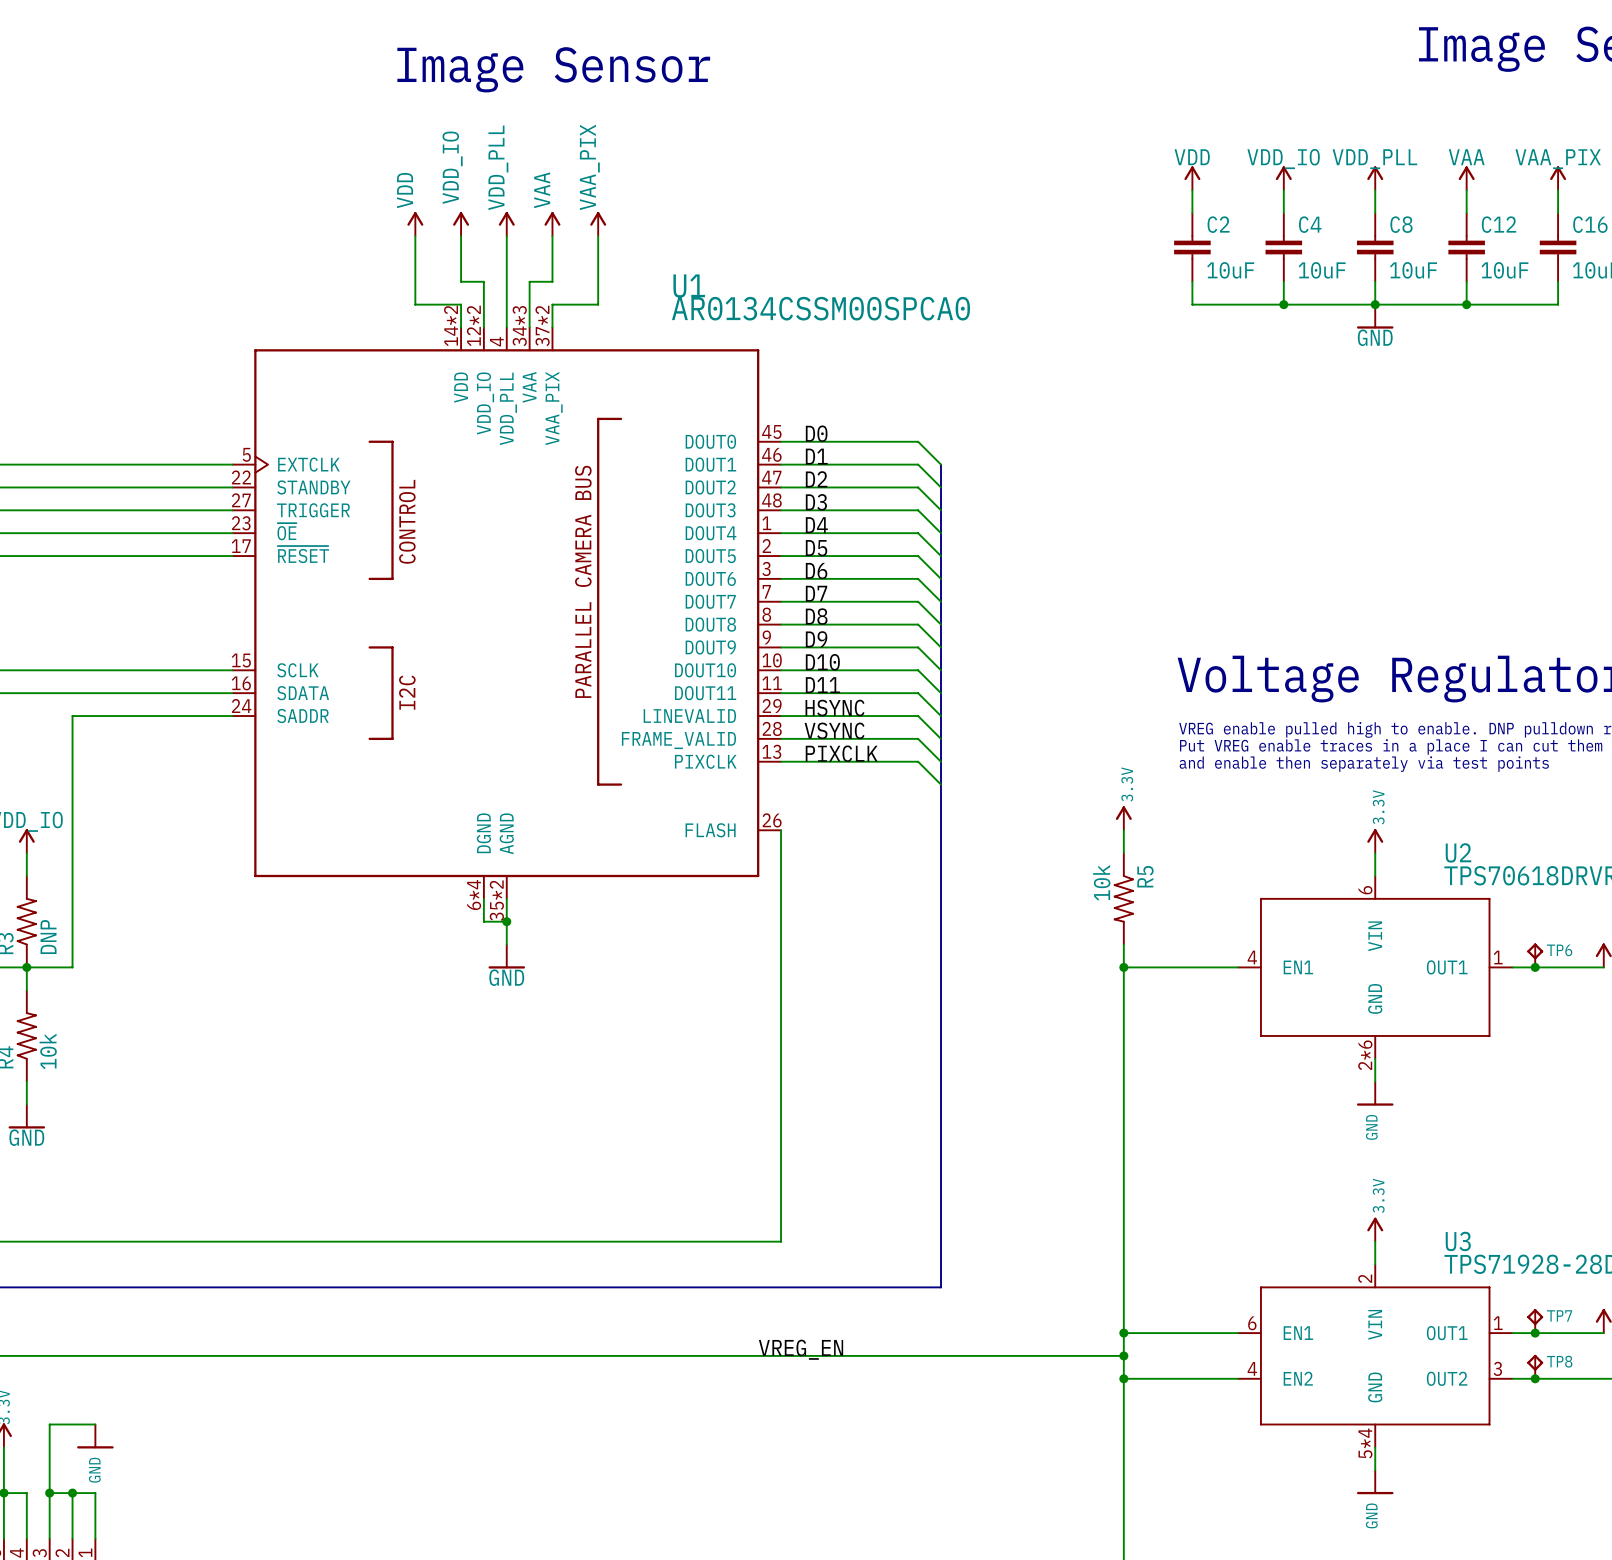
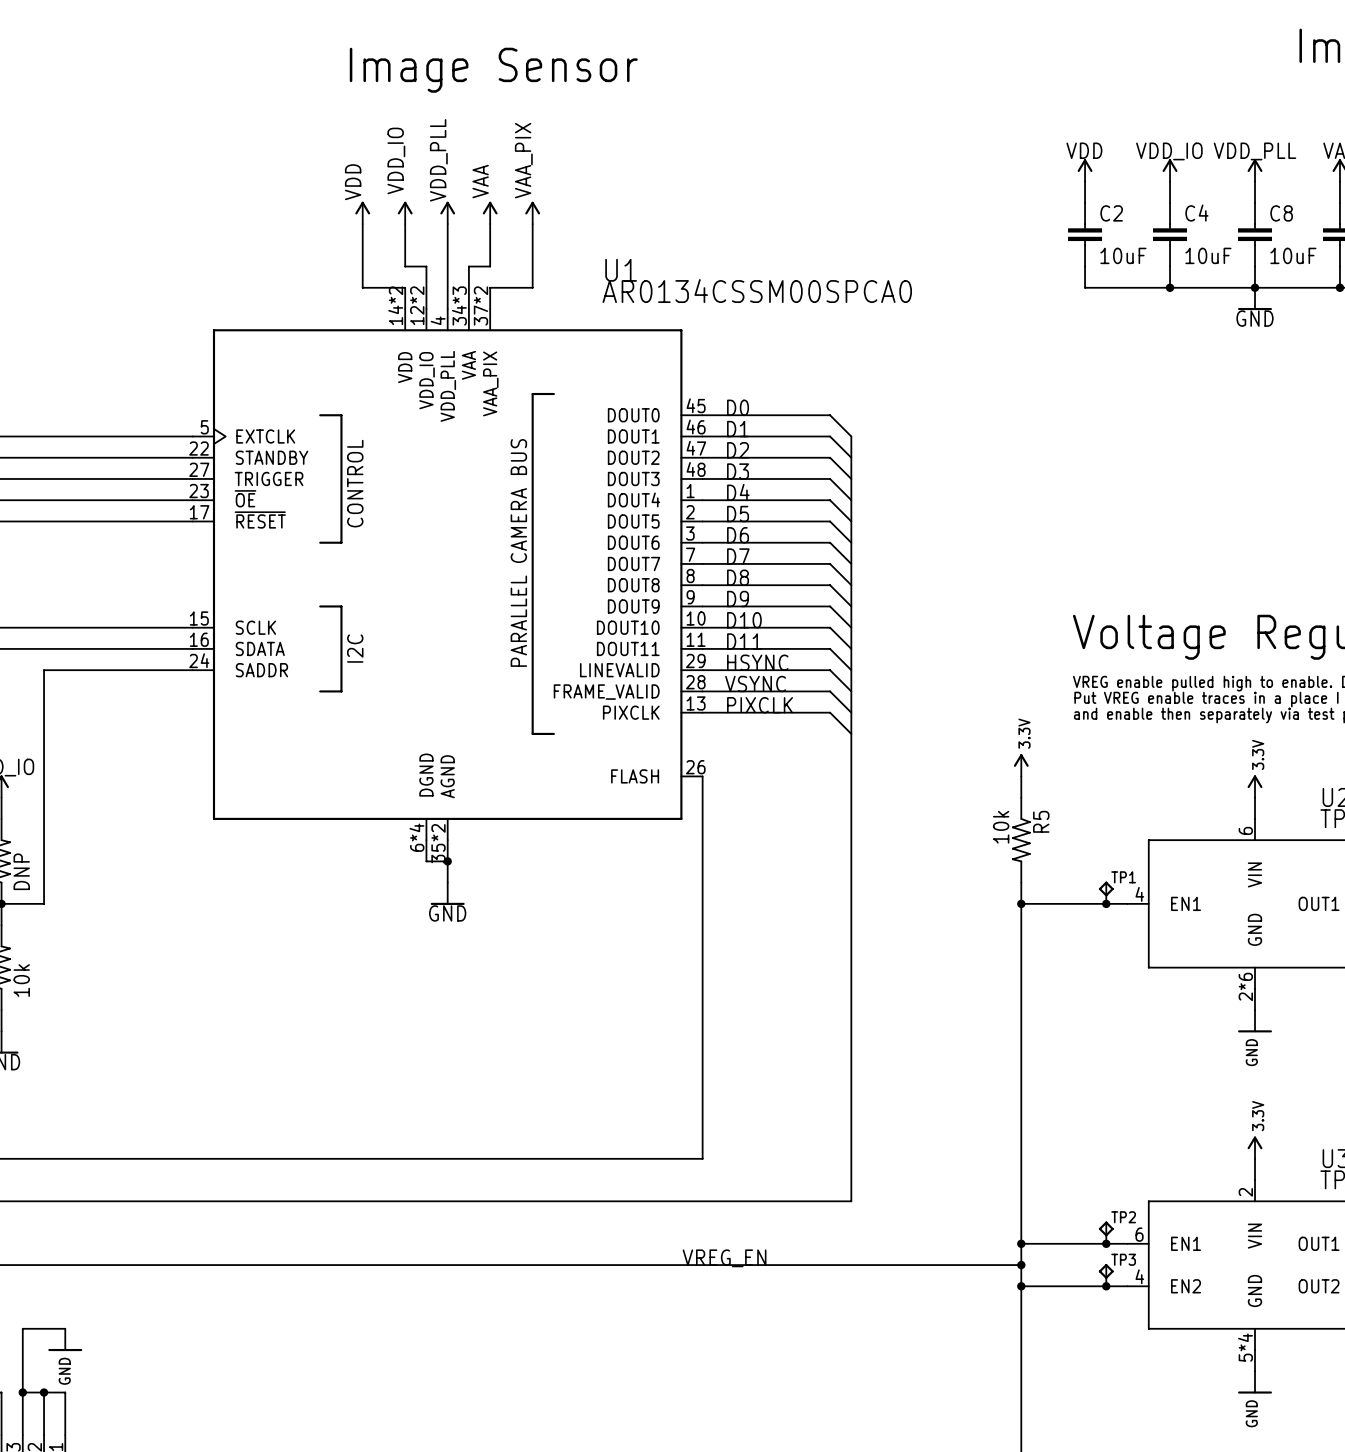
TP1: none -> (1106, 892)
junction: none -> (1106, 903)
TP2: none -> (1106, 1232)
junction: none -> (1106, 1243)
TP3: none -> (1106, 1275)
junction: none -> (1106, 1286)

